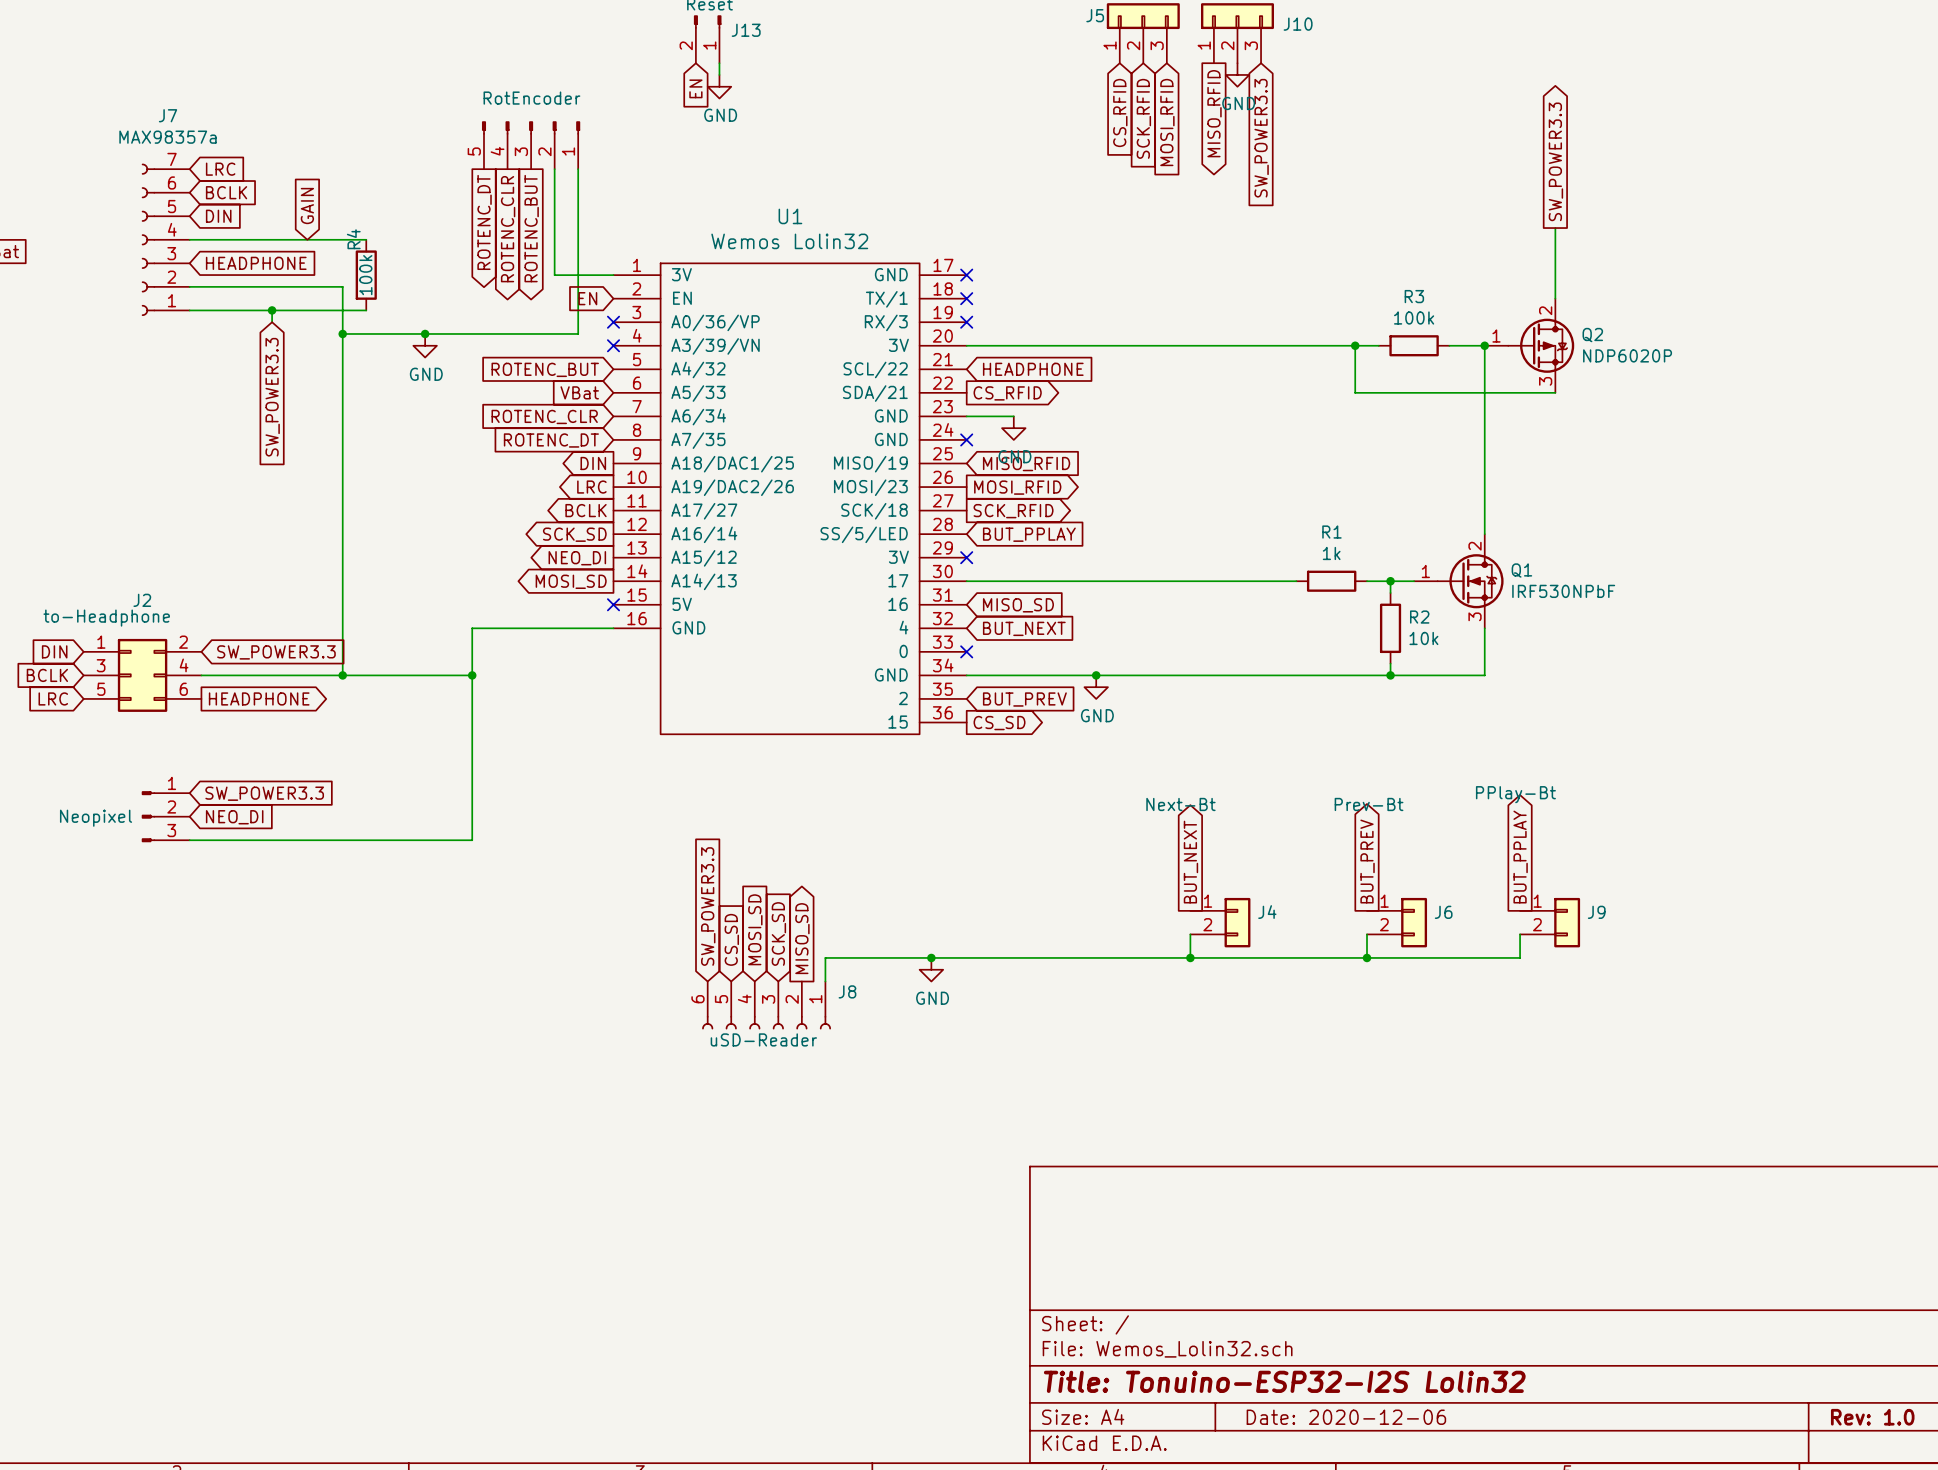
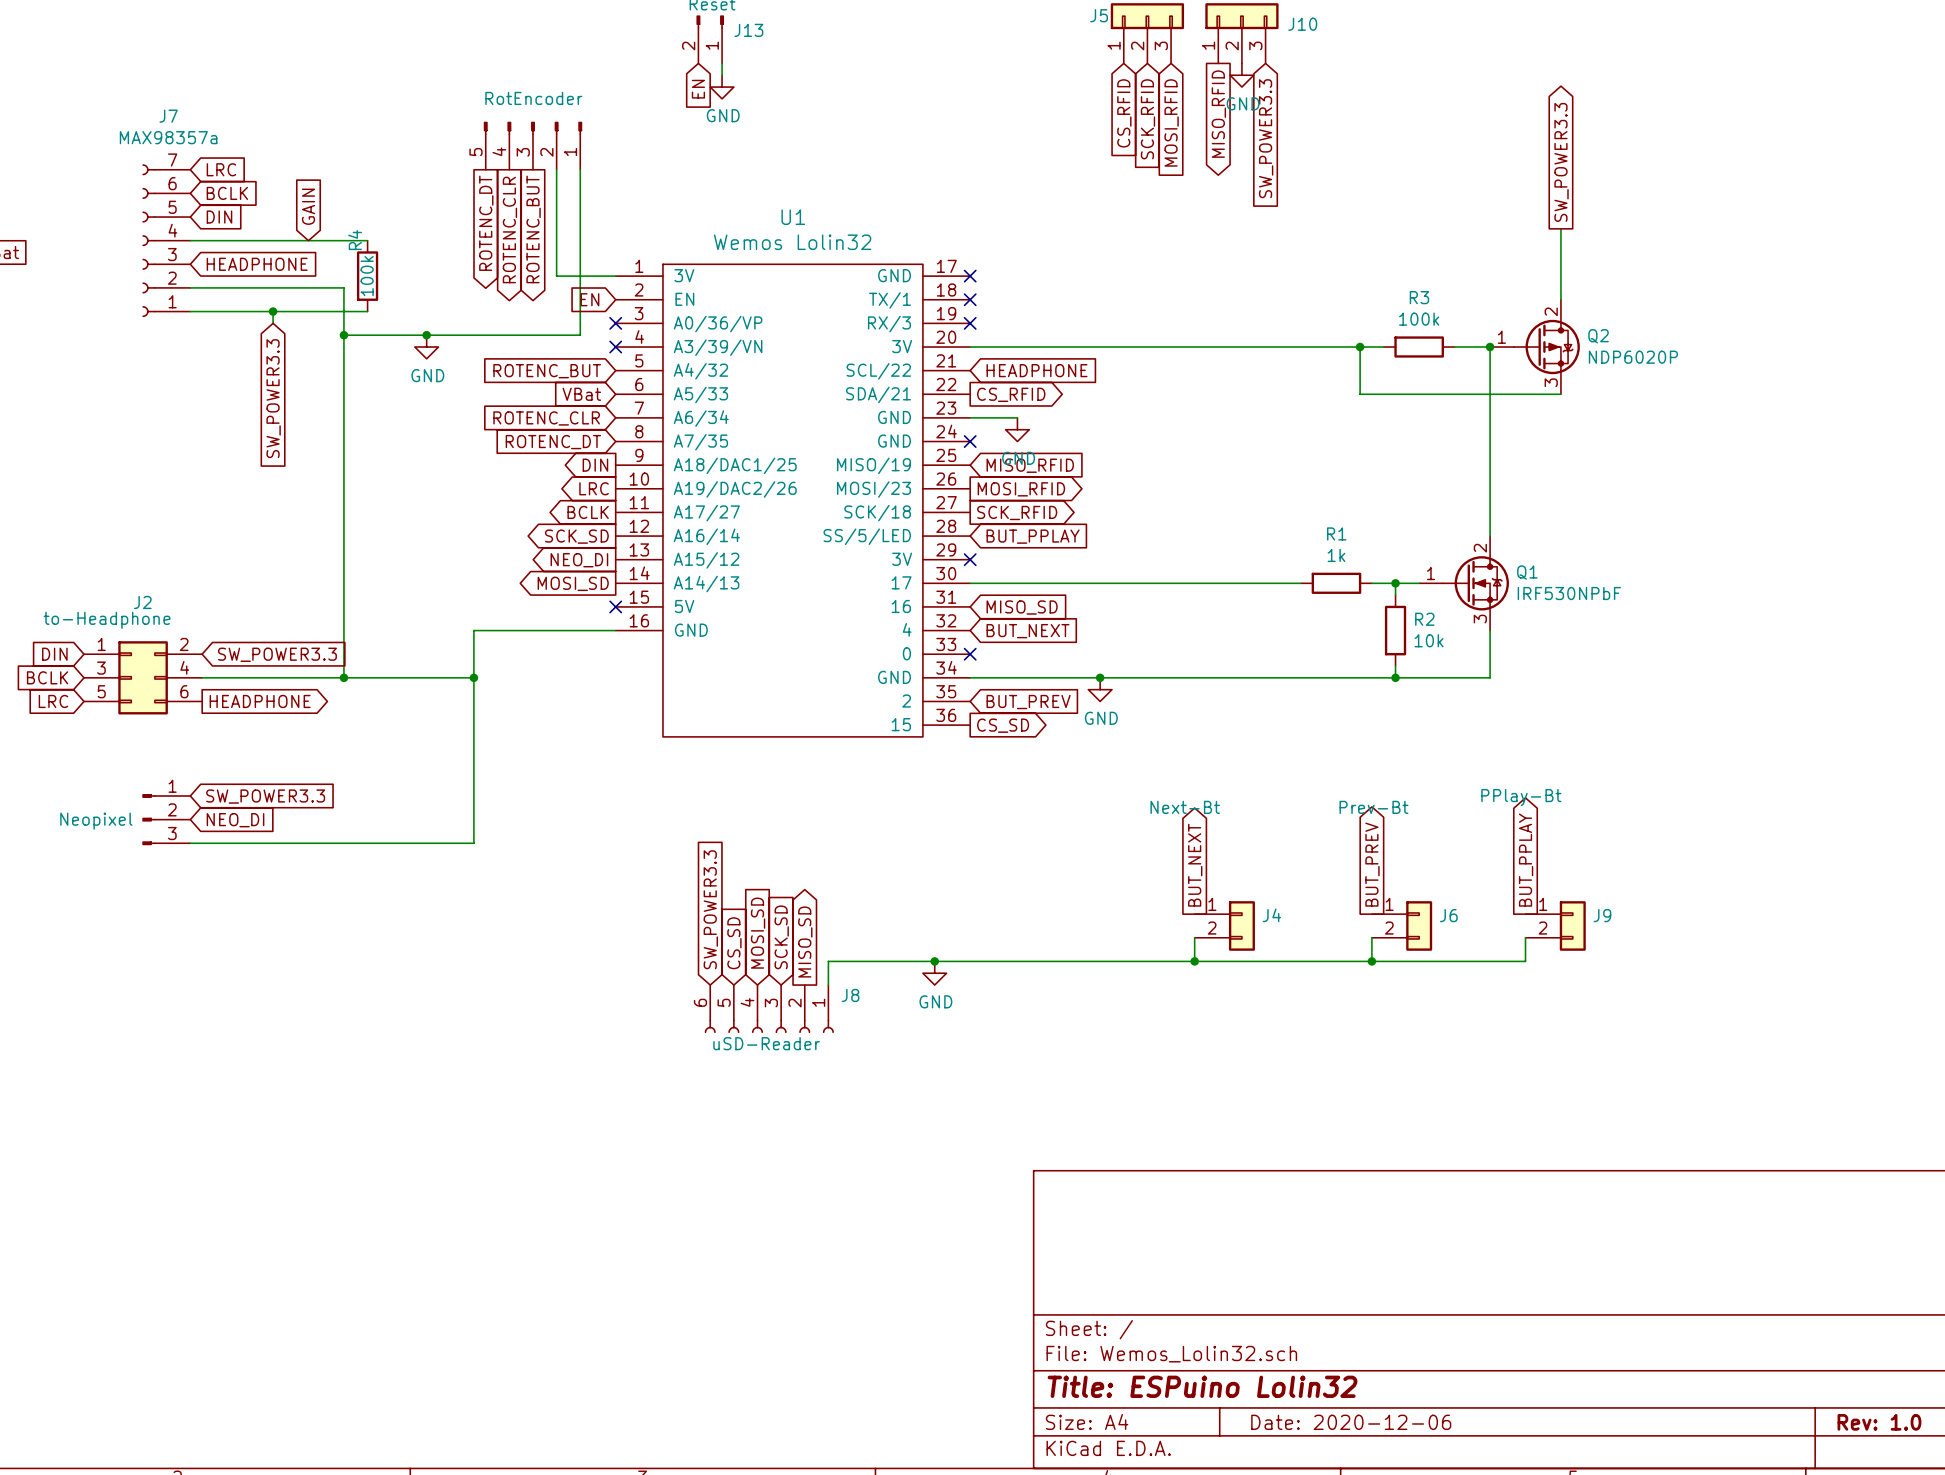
title block: Title: Tonuino-ESP32-I2S Lolin32 (1284, 1381) -> Title: ESPuino Lolin32 (1202, 1386)

